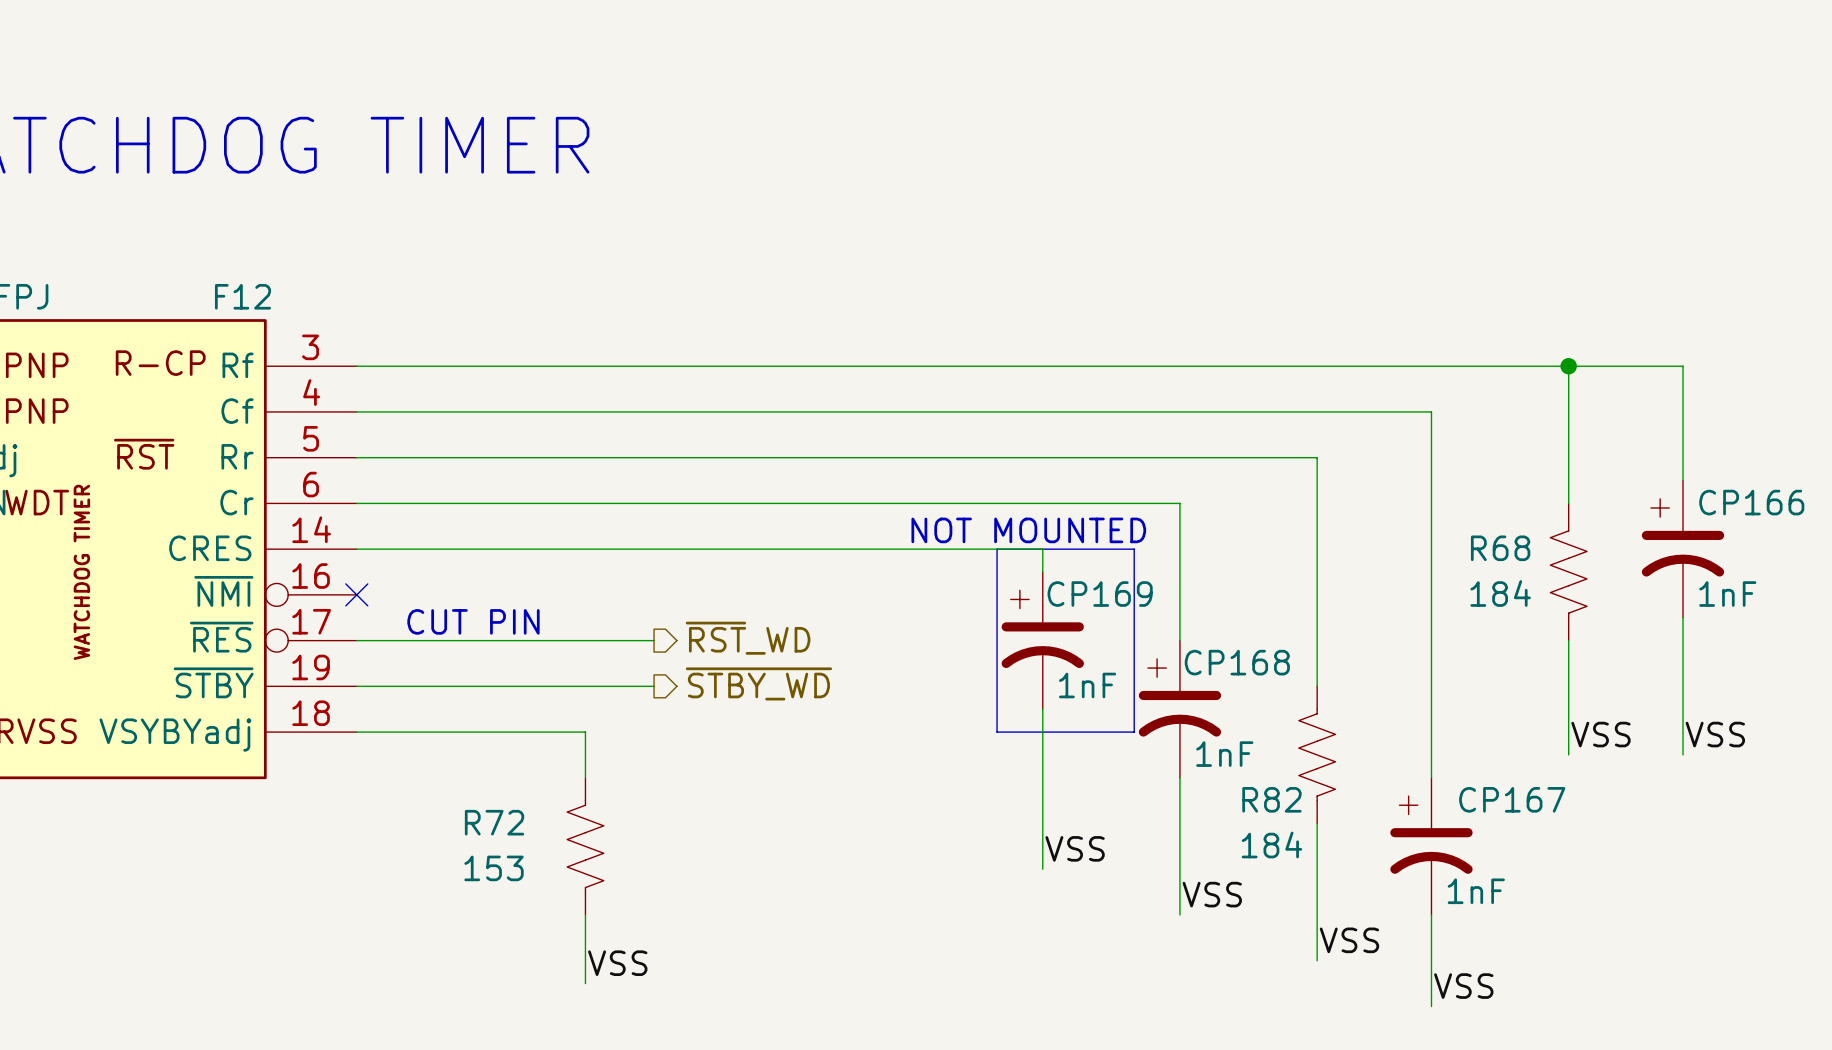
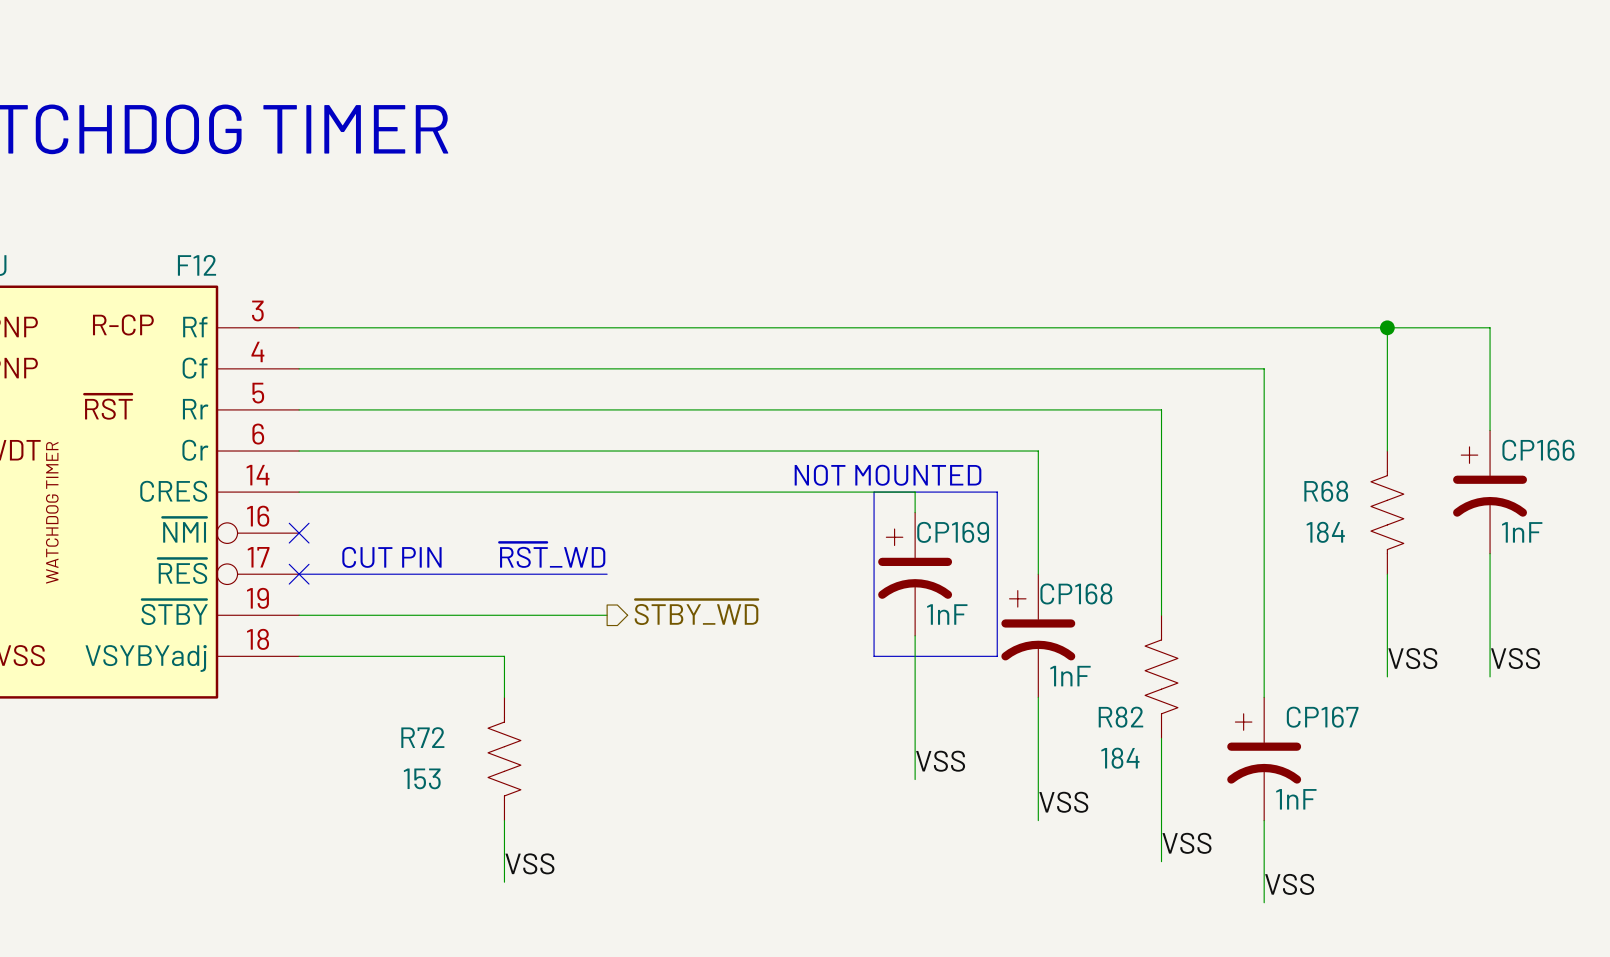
text: none -> ~{RST}_WD (552, 555)
hierarchical label: ~{RST}_WD (748, 638) -> none
line: none -> (299, 574) (607, 574)
no-connect mark: none -> (299, 574)
hierarchical label position: ~{STBY_WD} (758, 683) -> ~{STBY_WD} (696, 612)
wire: none -> (566, 615) (607, 615)

